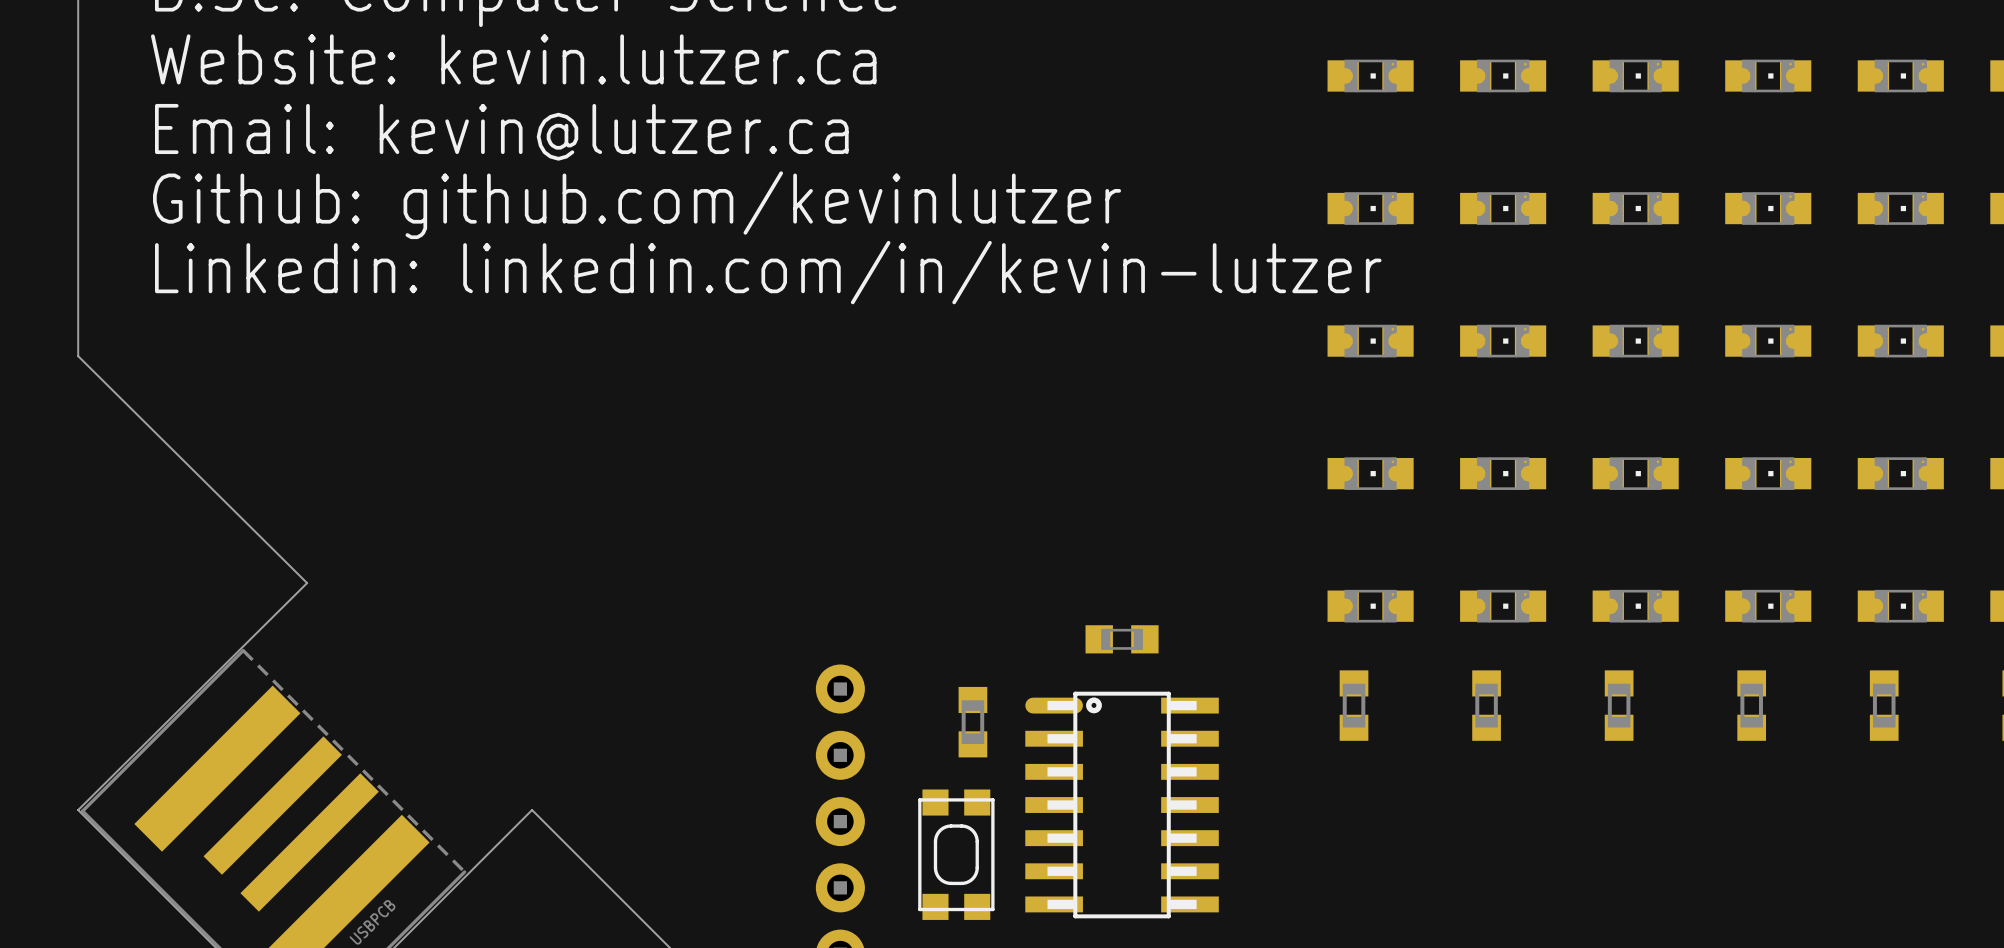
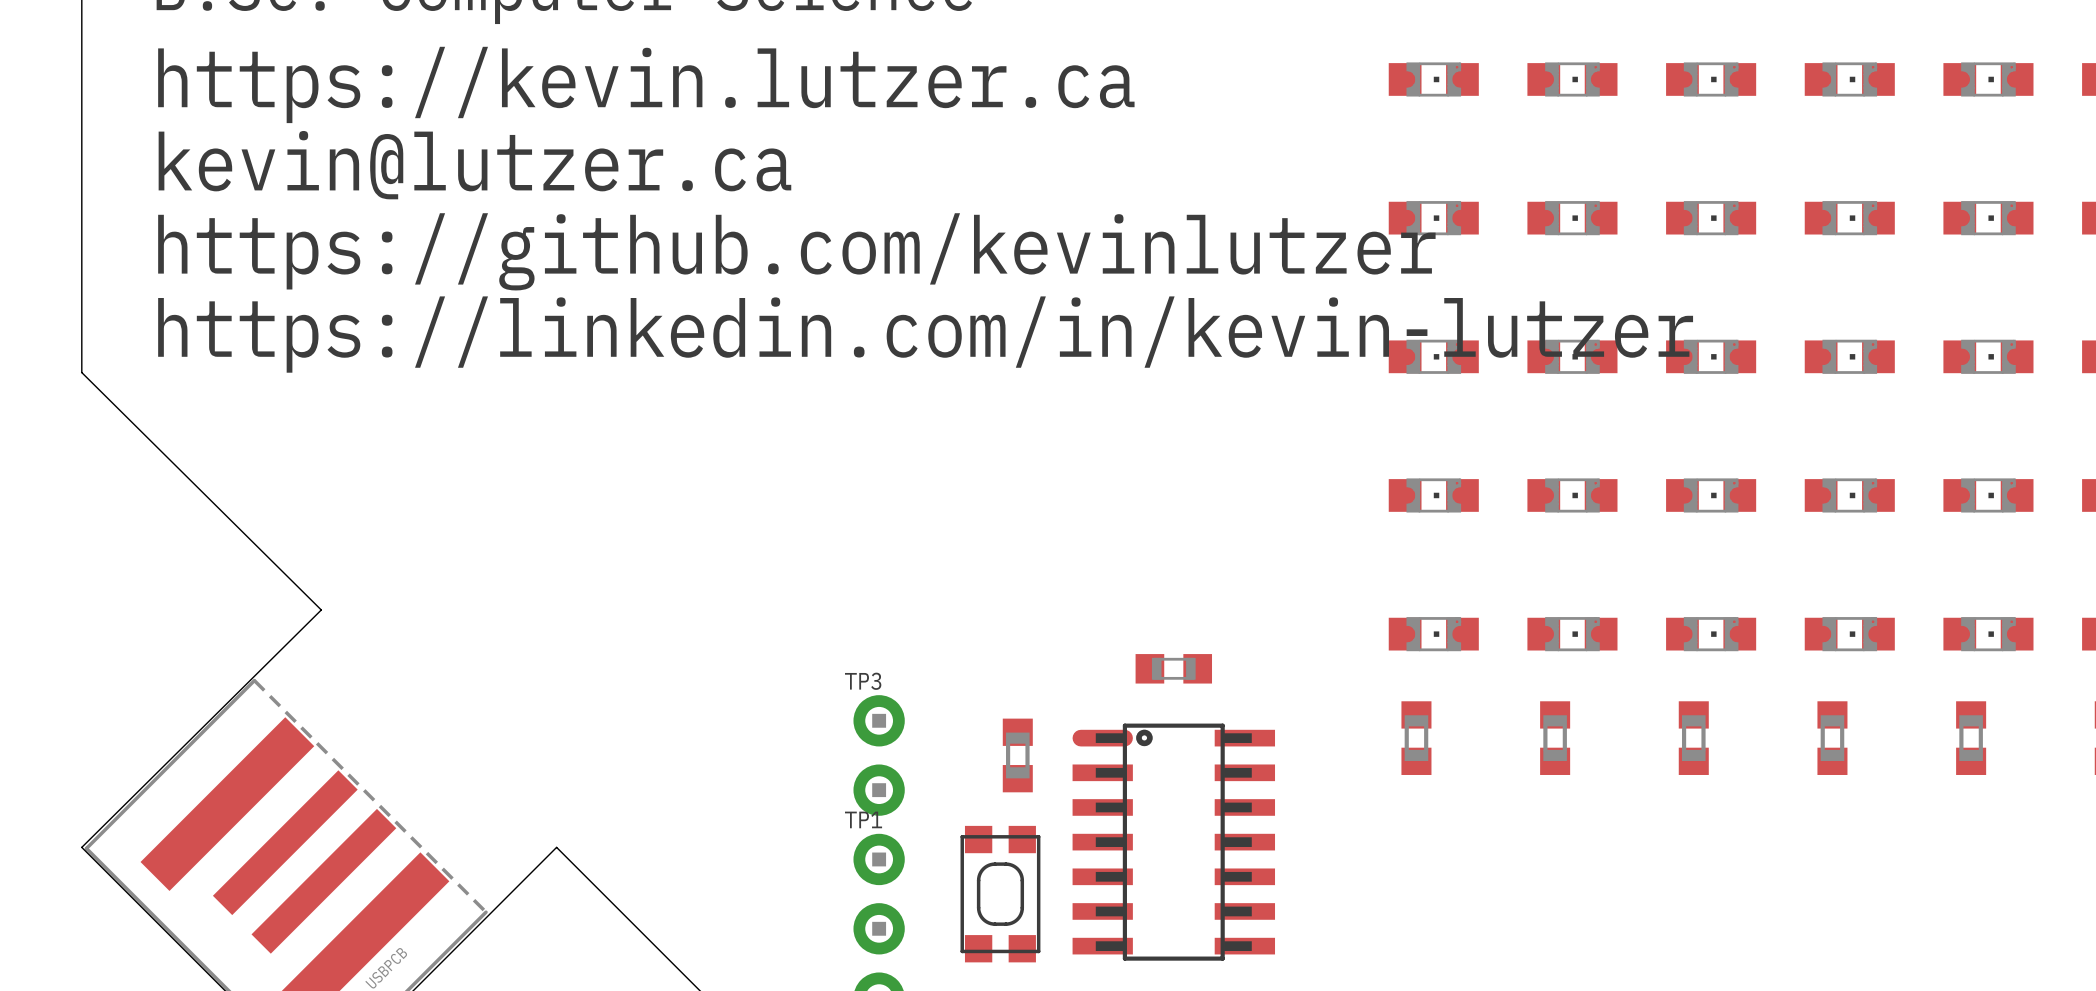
text: Website: kevin.lutzer.ca (513, 59) -> https://kevin.lutzer.ca (646, 84)
text: Email: kevin@lutzer.ca (501, 132) -> kevin@lutzer.ca (474, 165)
text: Github: github.com/kevinlutzer (637, 205) -> https://github.com/kevinlutzer (796, 251)
text: Linkedin: linkedin.com/in/kevin-lutzer (768, 272) -> https://linkedin.com/in/kevin-lutzer (925, 334)
TP3 name: none -> TP3 (863, 681)
TP1 name: none -> TP1 (863, 819)

